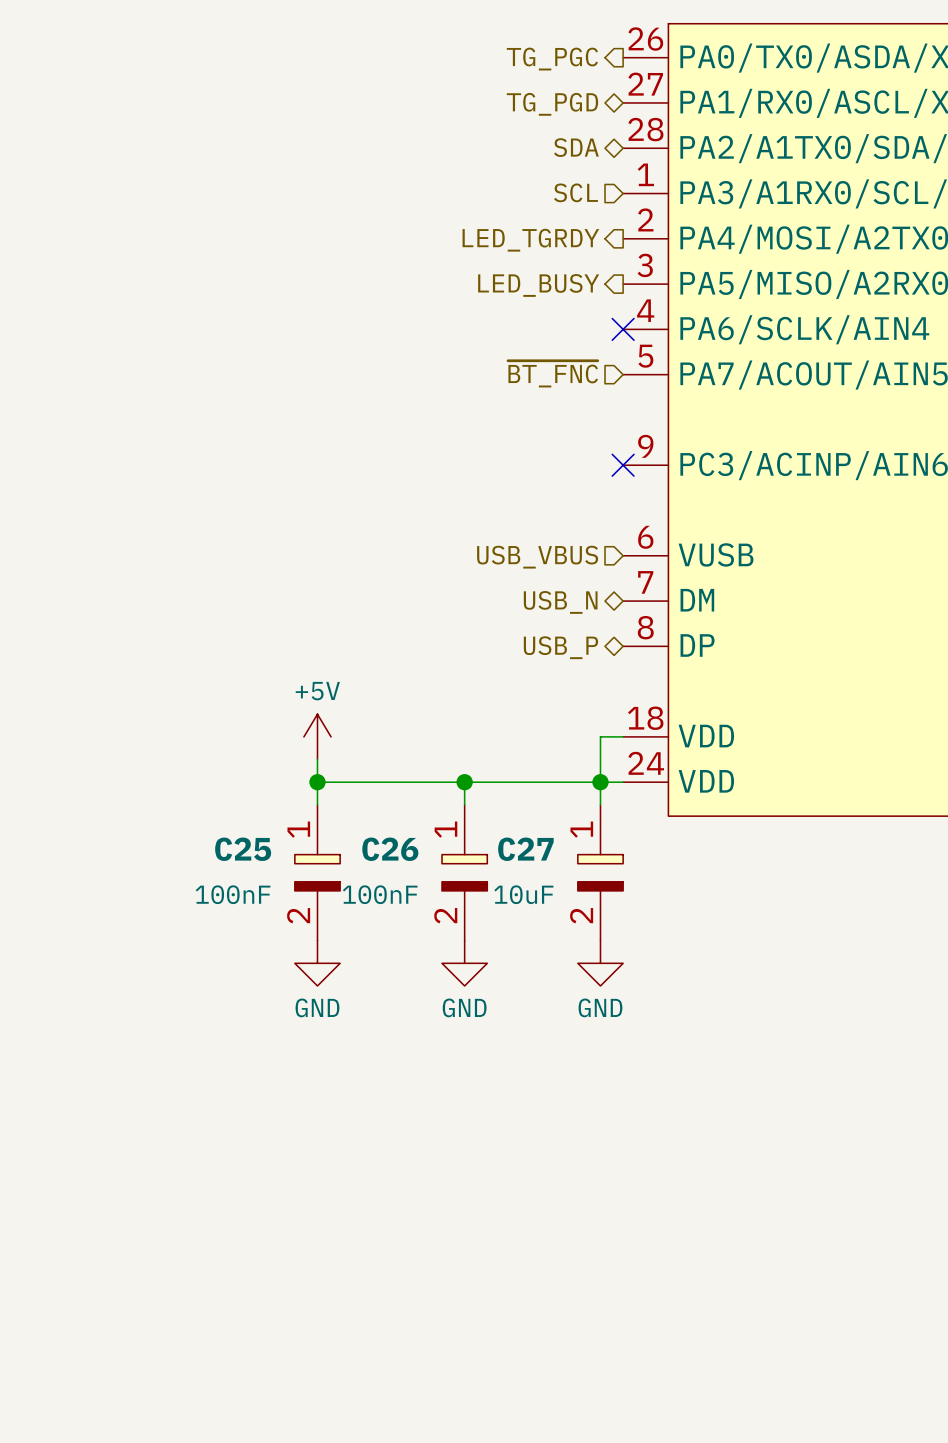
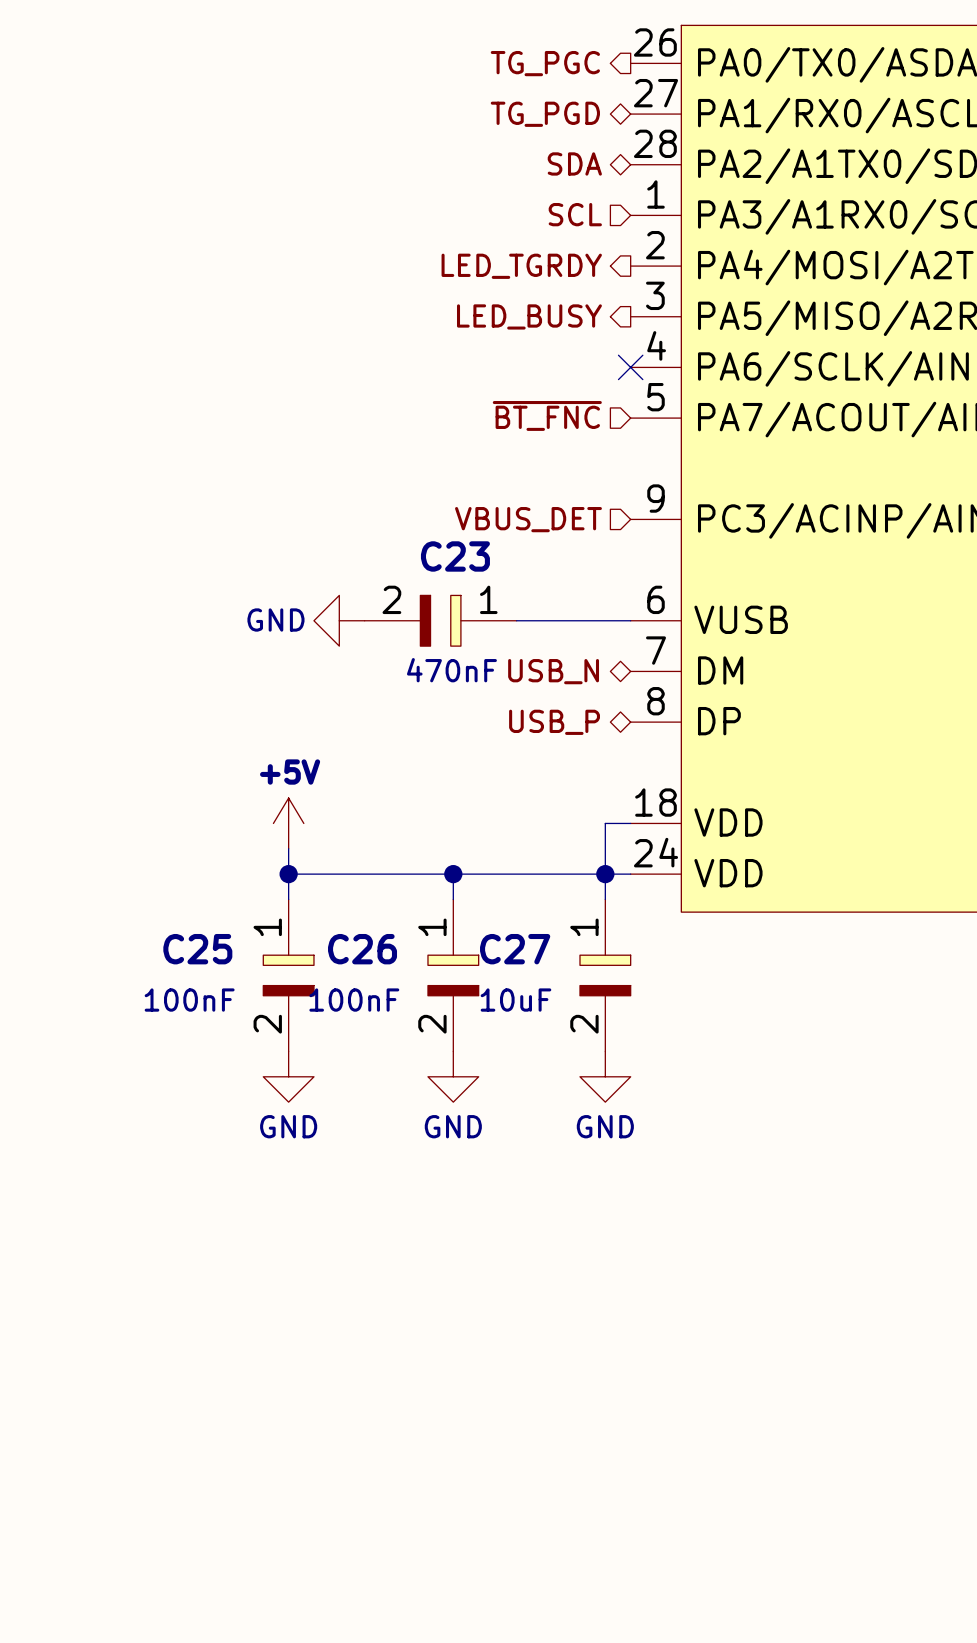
no-connect mark: (623, 465) -> none
hierarchical label: none -> VBUS_DET (528, 519)
power symbol: none -> GND (339, 620)
C23: none -> 470nF (440, 620)
wire: none -> (516, 620) (630, 620)
hierarchical label: USB_VBUS (537, 557) -> none

